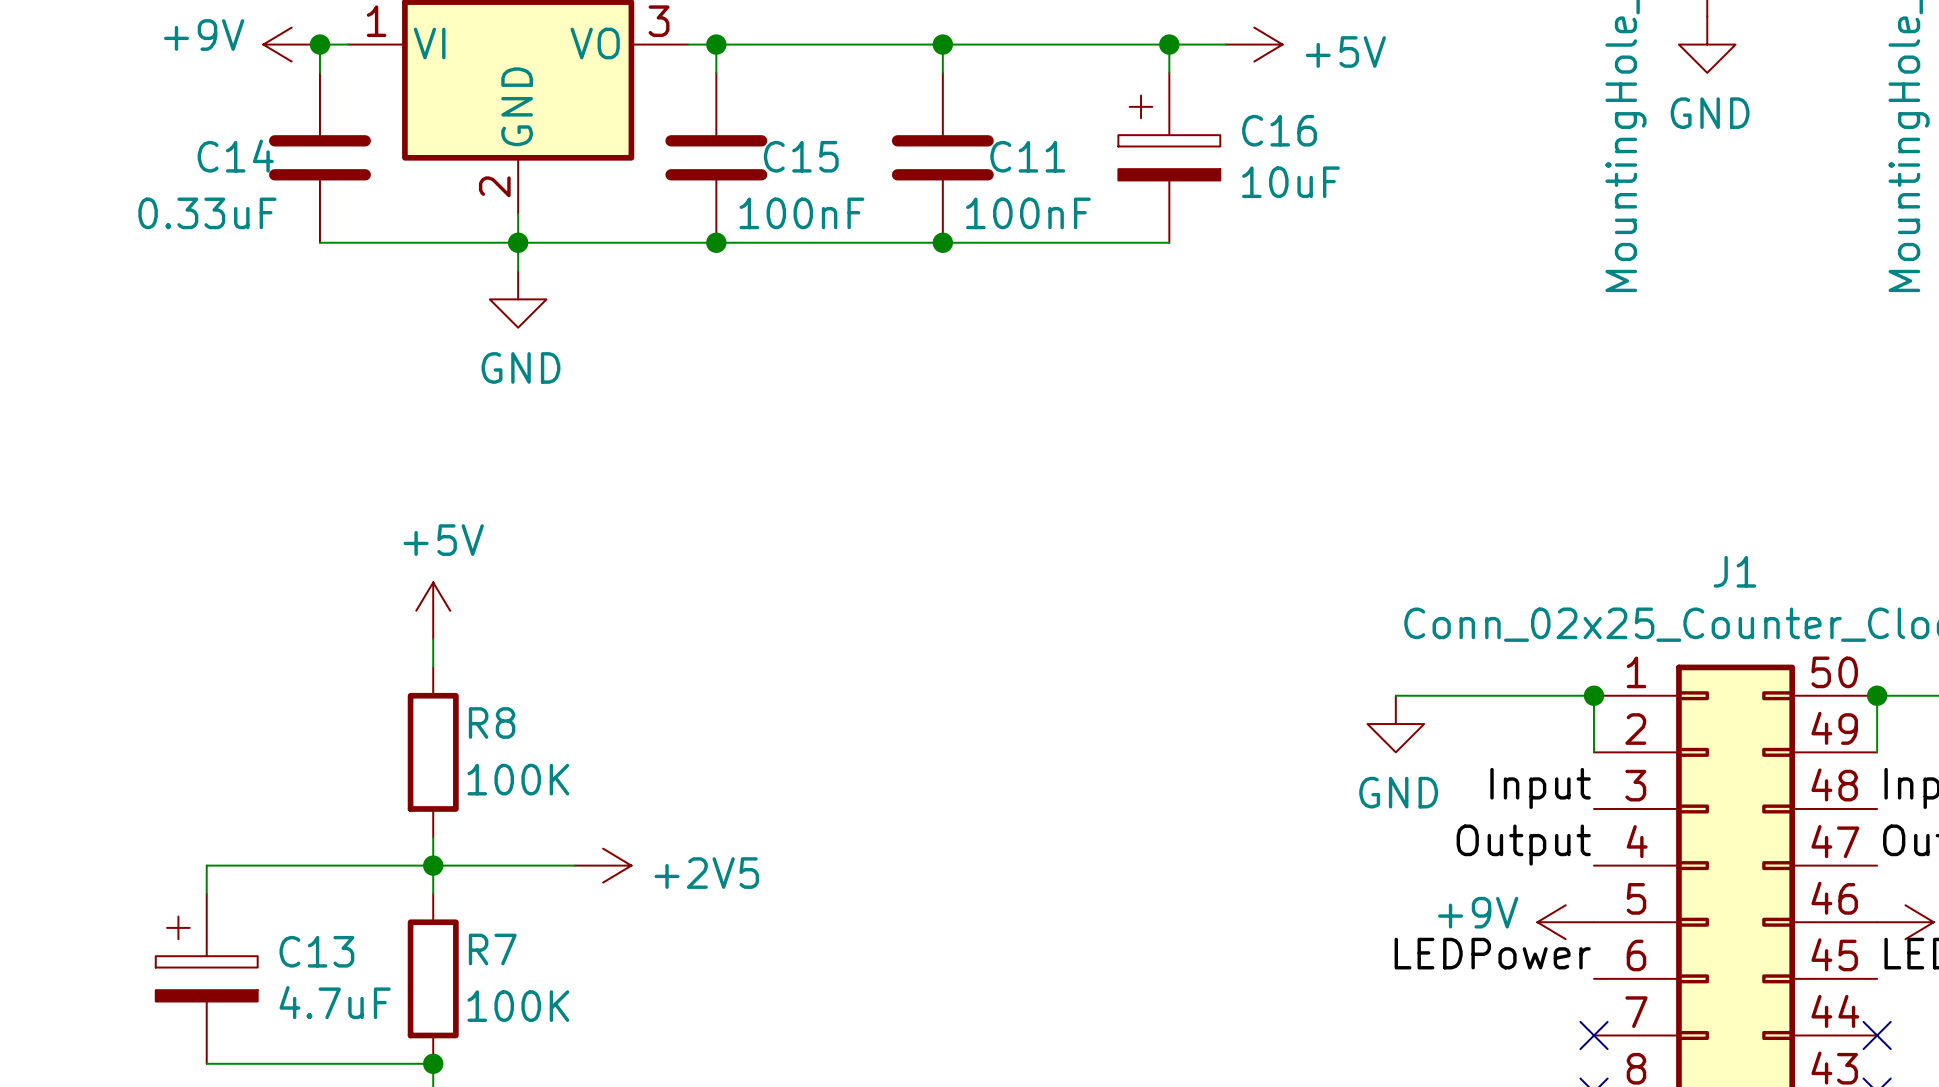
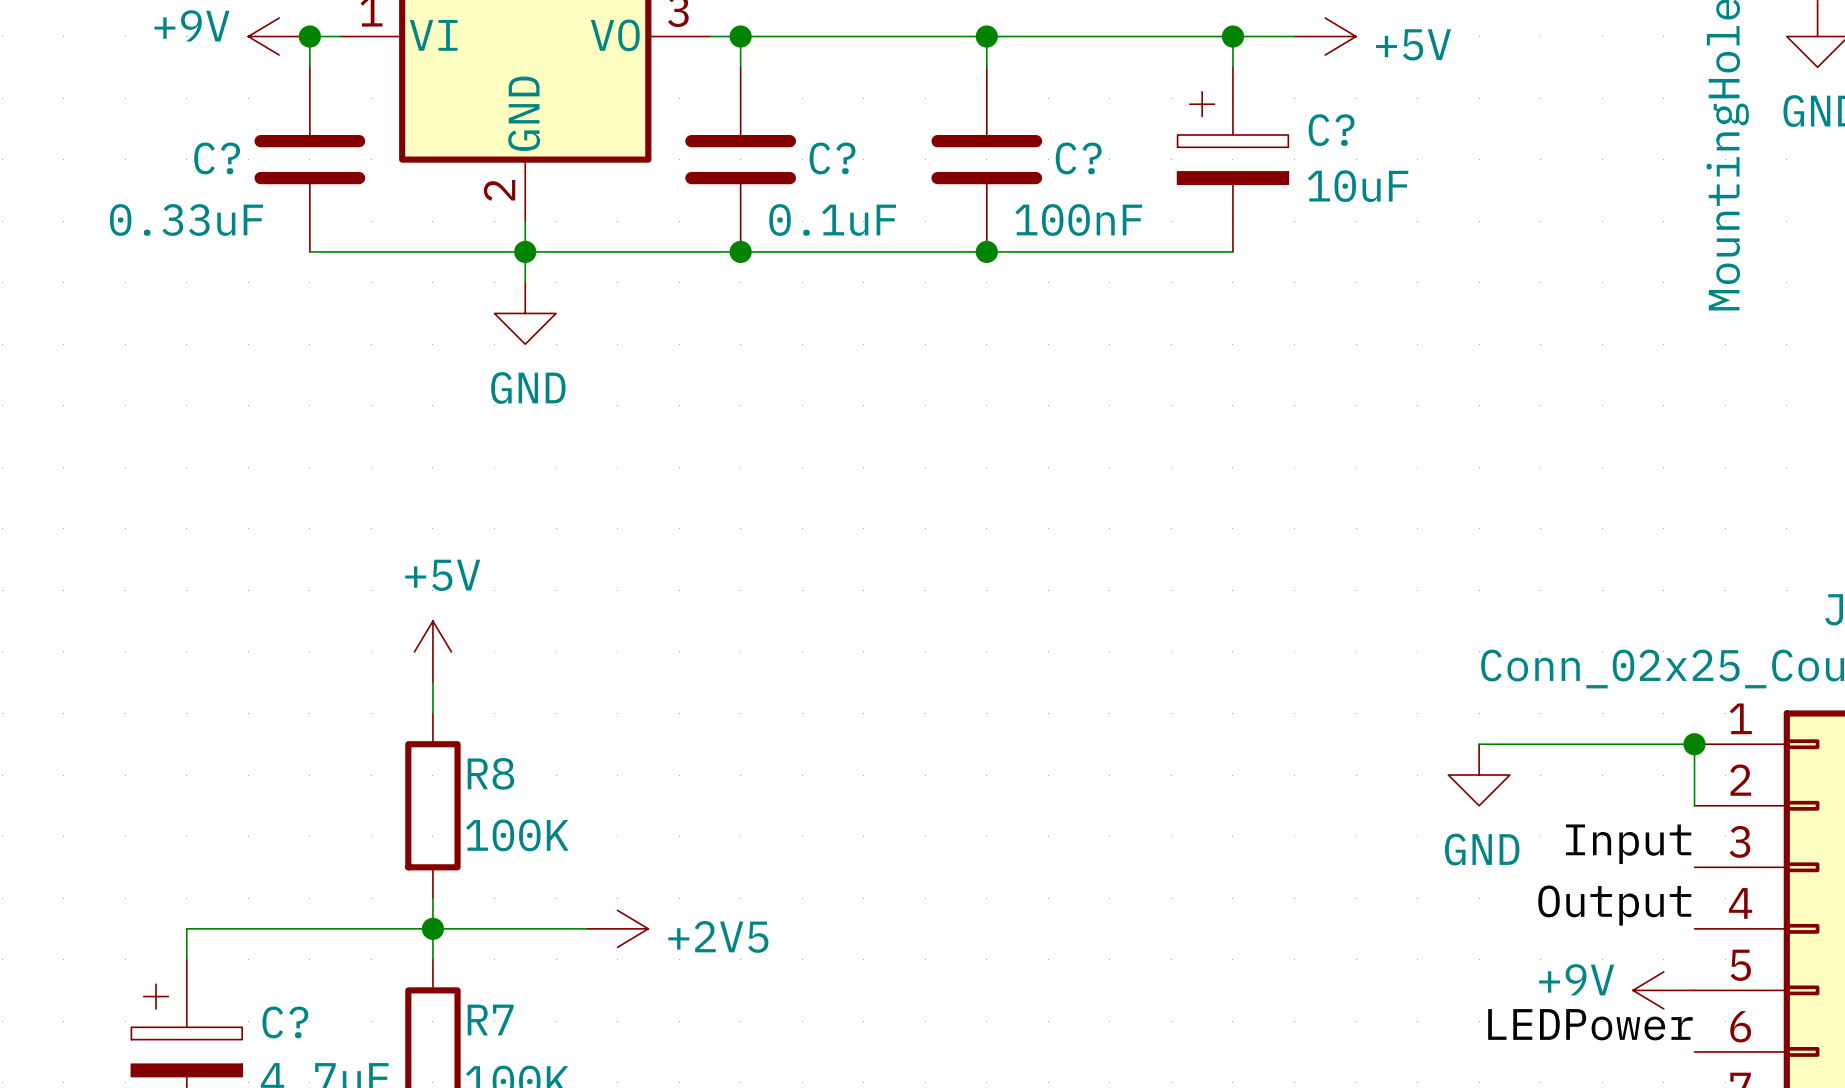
C16 name: C16 (1279, 130) -> C? (1331, 130)
C14 name: C14 (235, 156) -> C? (217, 158)
C15 name: C15 (801, 156) -> C? (832, 158)
C11 name: C11 (1027, 156) -> C? (1078, 158)
C15 value: 100nF (801, 213) -> 0.1uF (832, 219)
C13 name: C13 (316, 951) -> C? (285, 1022)

